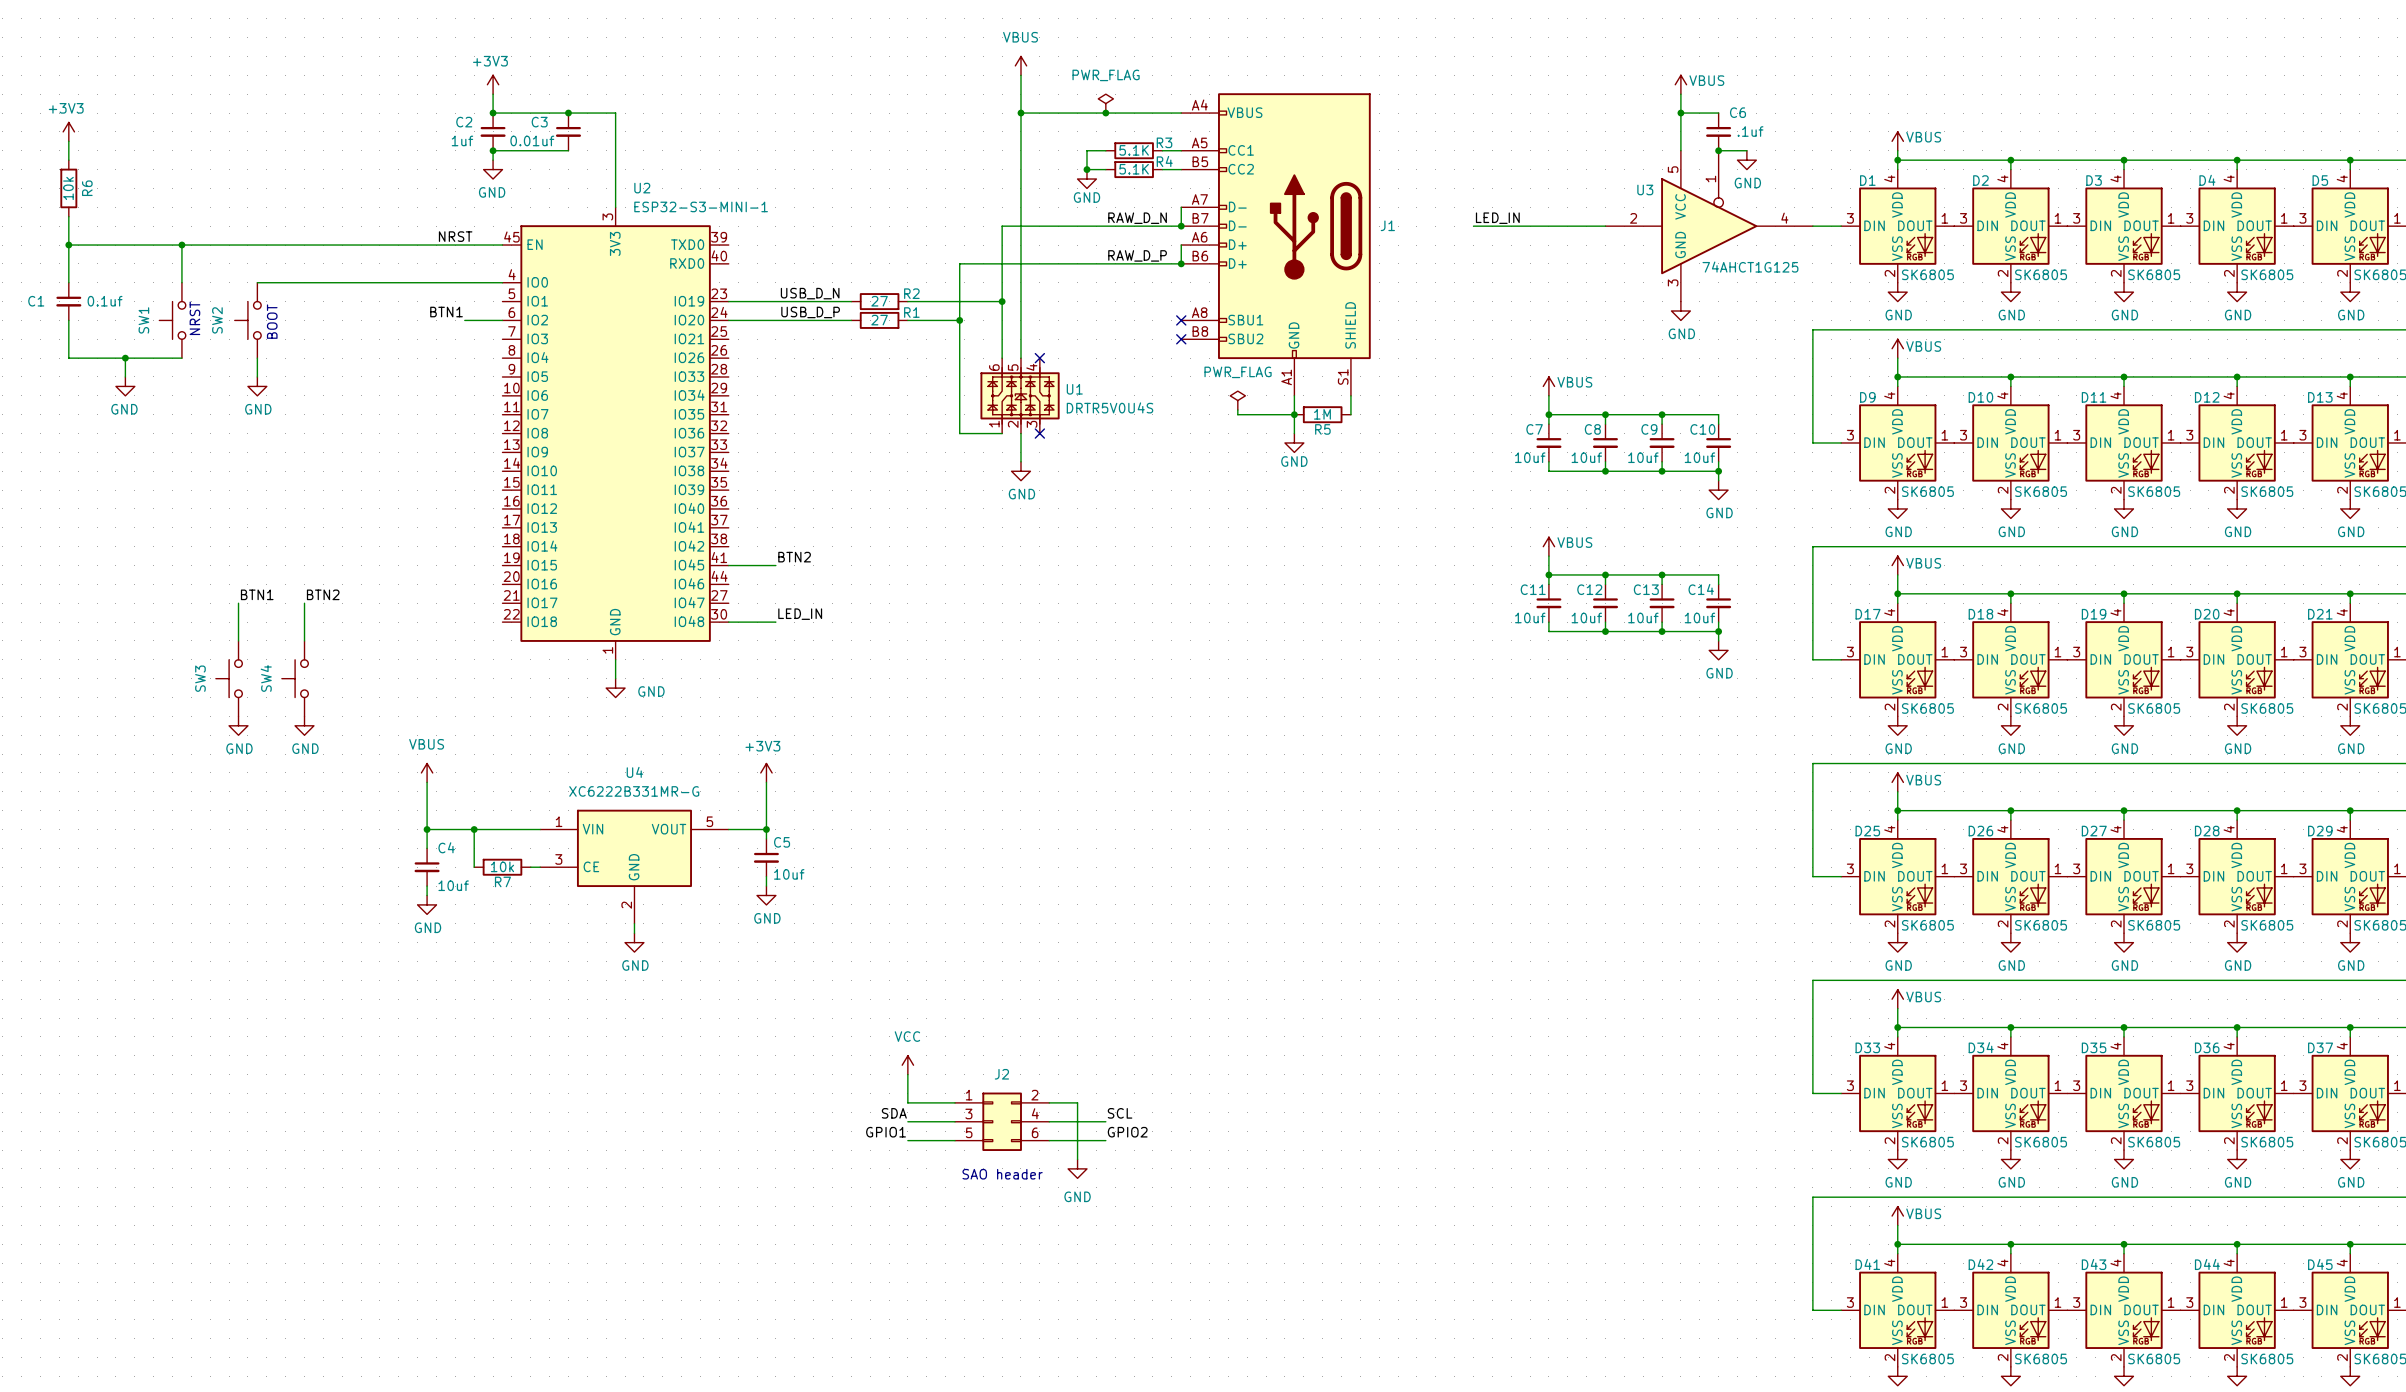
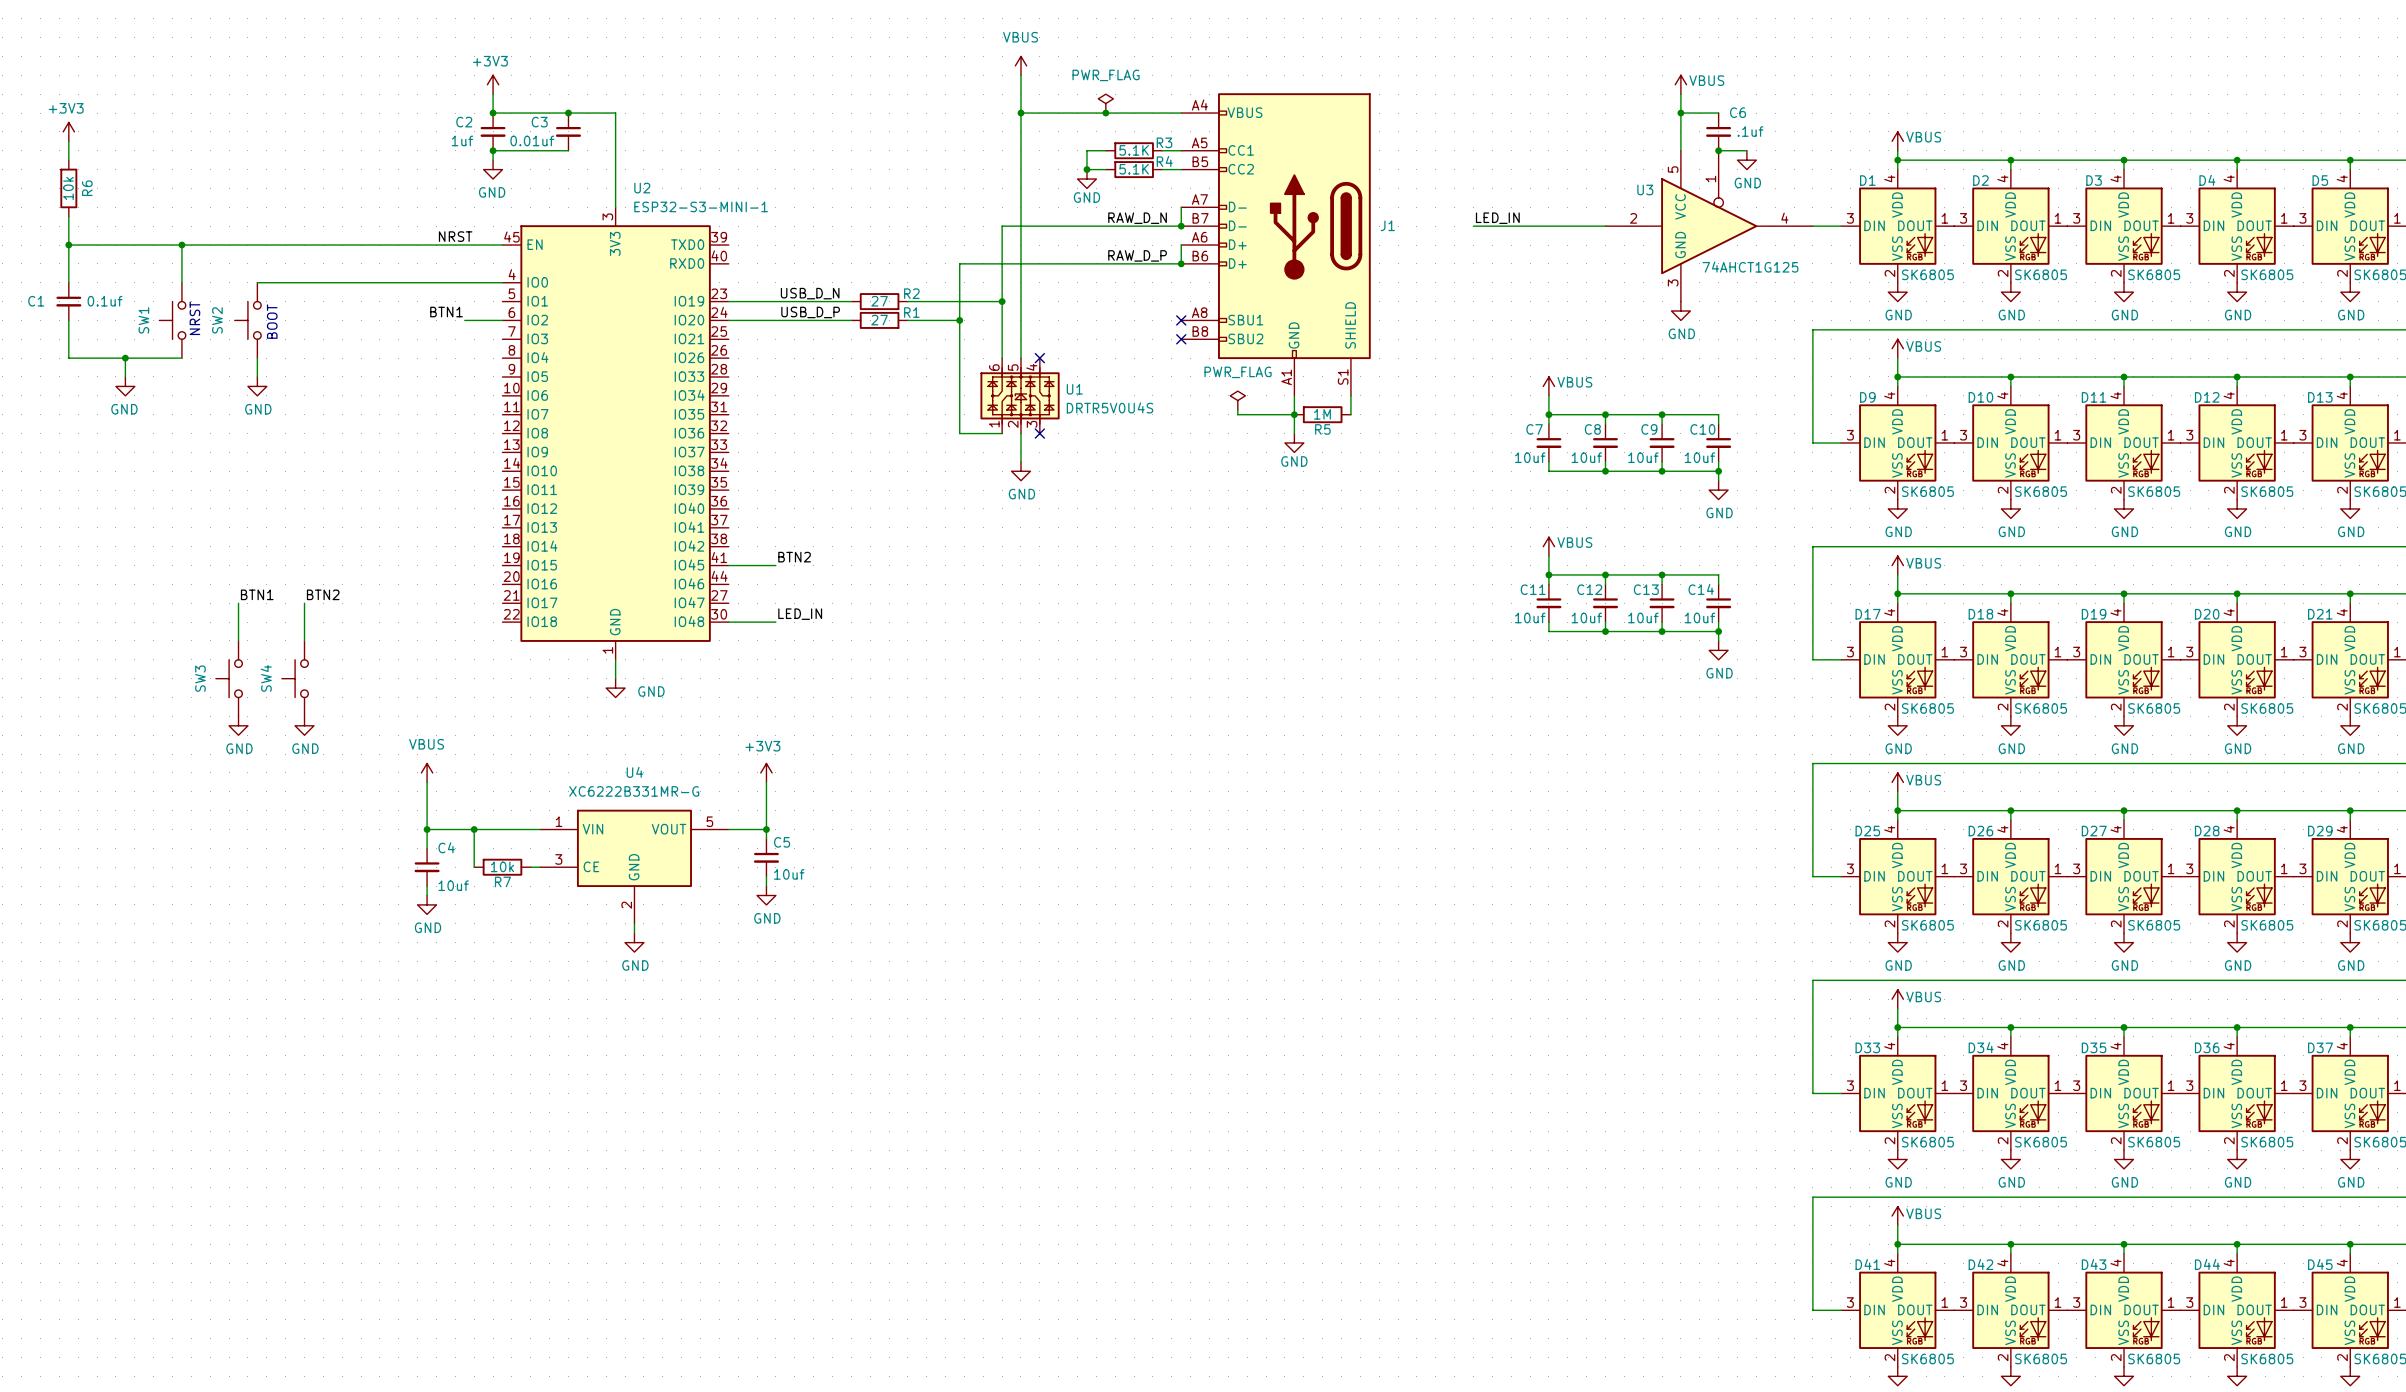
power symbol: VCC (907, 1065) -> none
wire: (907, 1074) (907, 1102) (955, 1102) -> none
wire: (1049, 1102) (1077, 1102) (1077, 1159) -> none
label: SDA (894, 1113) -> none
label: SCL (1120, 1113) -> none
wire: (907, 1121) (955, 1121) -> none
J2: (1002, 1121) -> none
wire: (1049, 1121) (1105, 1121) -> none
label: GPIO1 (886, 1132) -> none
label: GPIO2 (1127, 1132) -> none
wire: (907, 1140) (955, 1140) -> none
wire: (1049, 1140) (1105, 1140) -> none
power symbol: GND (1077, 1168) -> none
text: SAO header (1002, 1174) -> none

